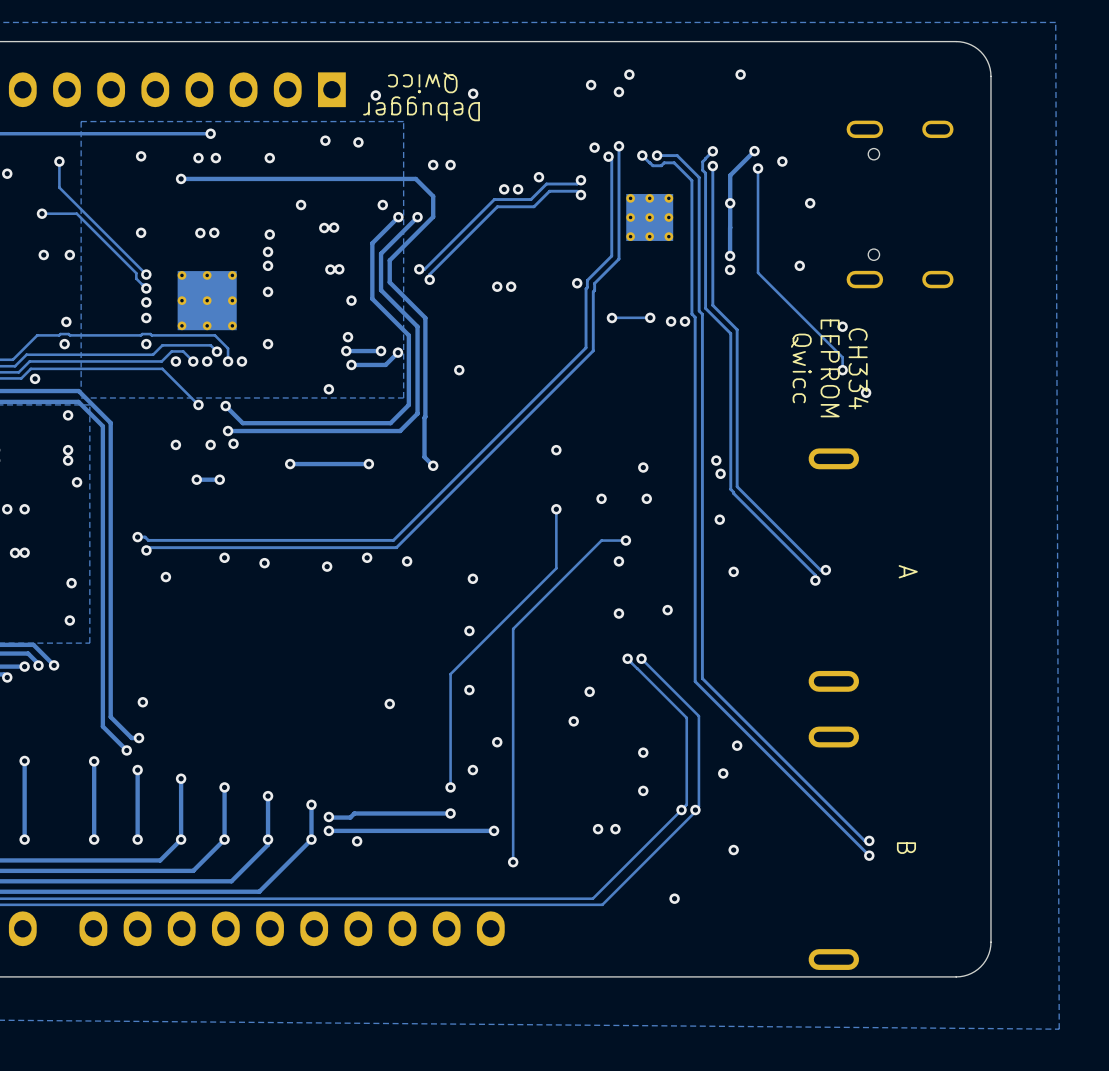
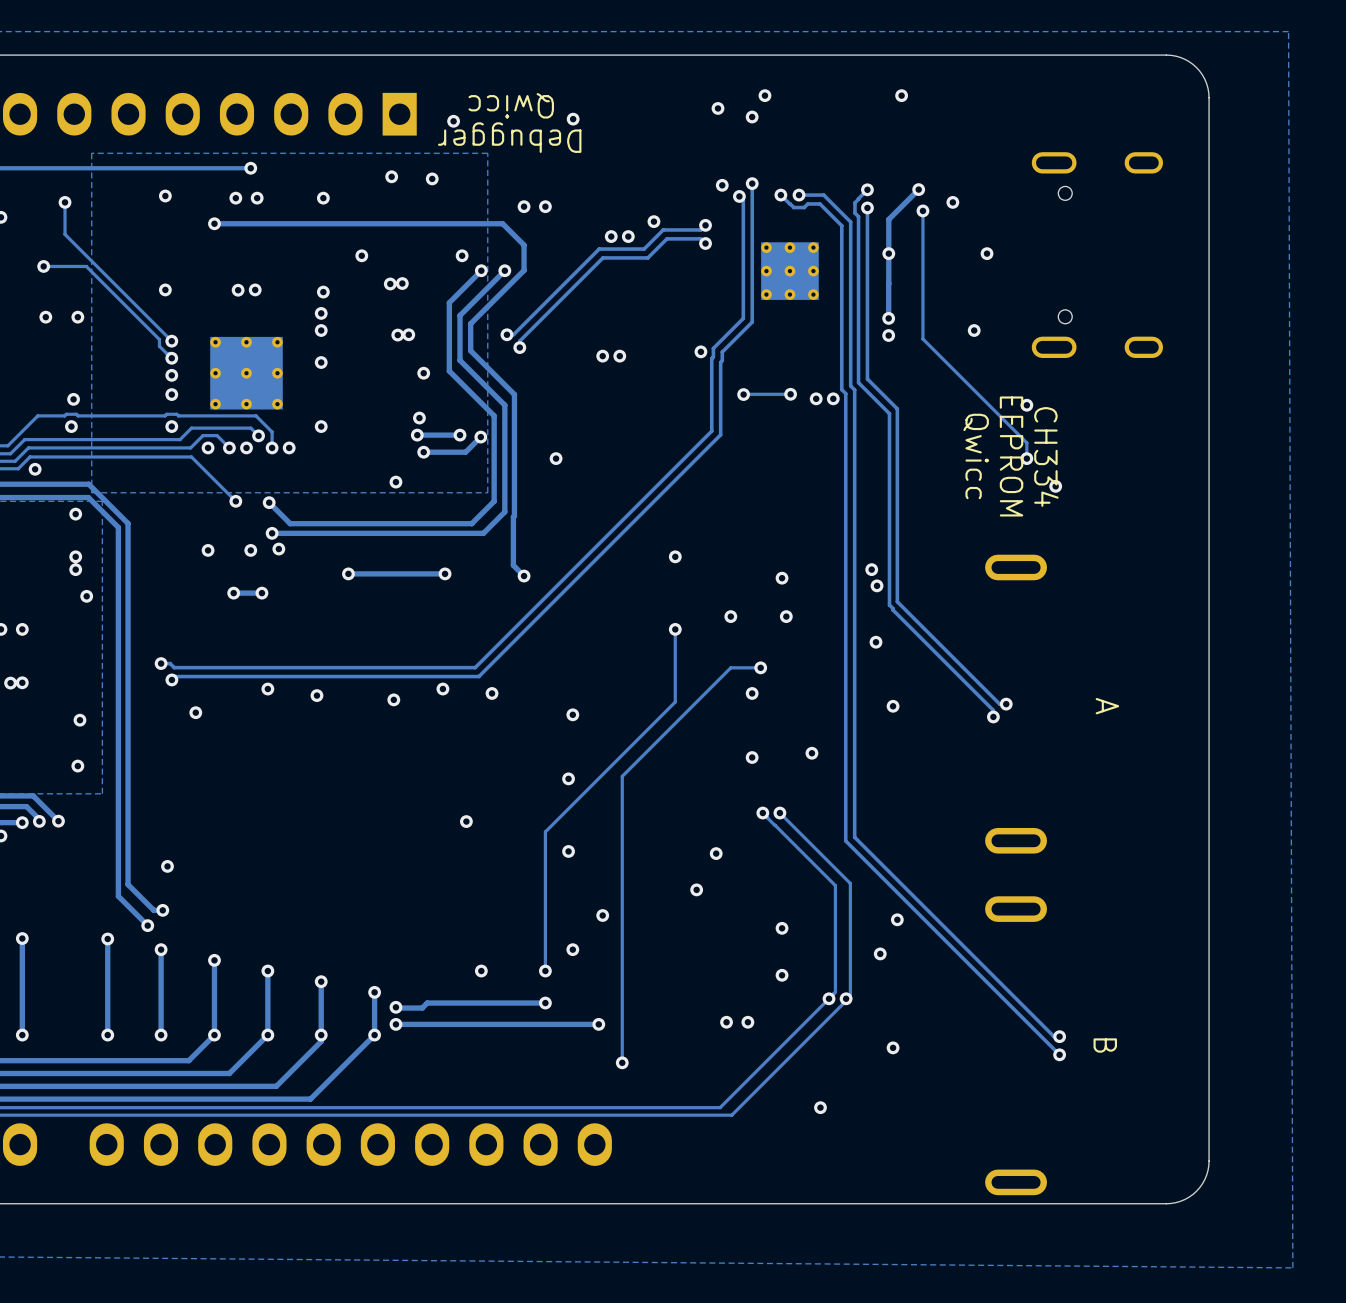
via position: (389, 703) -> (466, 821)
via: none -> (481, 971)
via: (357, 841) -> none

